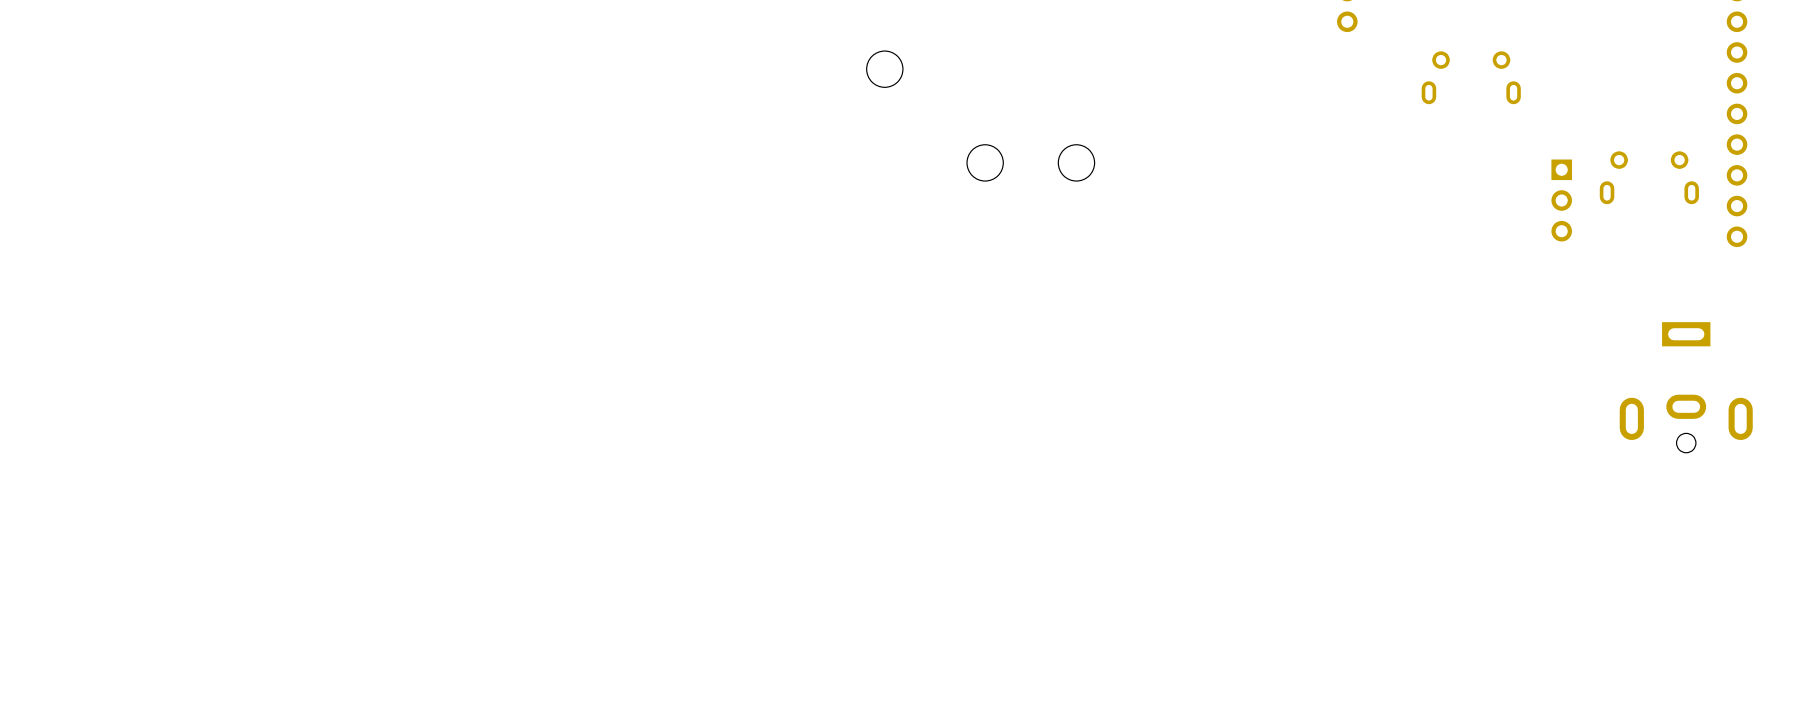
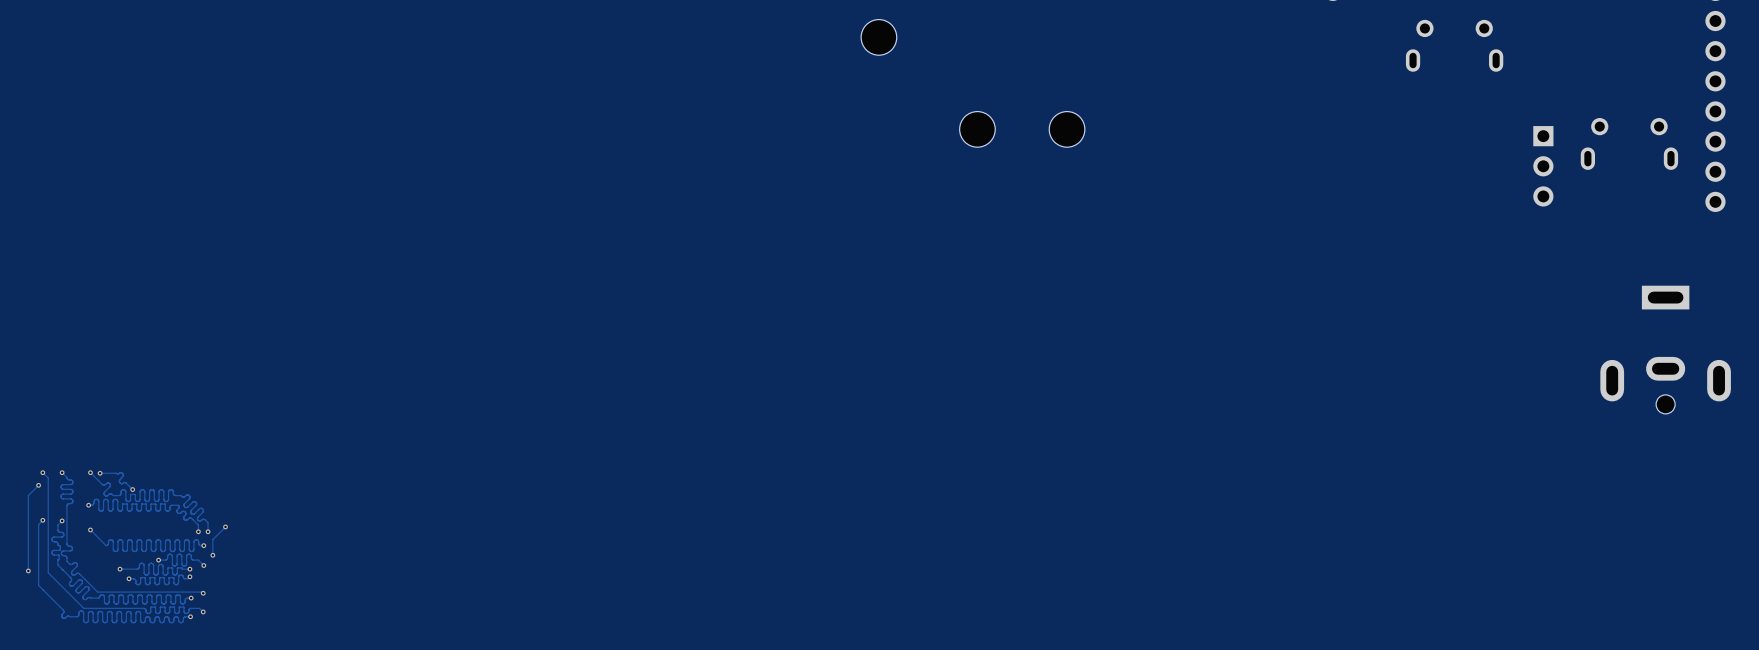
track: none -> (42, 472) (48, 478) (48, 572) (83, 608) (143, 608) (148, 613) (150, 607)
via: none -> (42, 472)
track: none -> (62, 472) (72, 482) (61, 486) (62, 489) (72, 491) (71, 493) (62, 494) (61, 496) (62, 498) (72, 500) (66, 505) (67, 544) (72, 549) (62, 551) (61, 553) (66, 556) (69, 564) (77, 563) (71, 572) (72, 574) (79, 573) (97, 592) (203, 593)
via: none -> (62, 472)
track: none -> (90, 472) (102, 484) (110, 484) (104, 492) (105, 495) (110, 493) (119, 495) (123, 489) (126, 500) (128, 501) (130, 500) (130, 494)
via: none -> (90, 472)
track: none -> (100, 473) (121, 472) (123, 475) (119, 482) (125, 482) (132, 489)
via: none -> (100, 473)
track: none -> (38, 485) (28, 495) (28, 570)
via: none -> (38, 485)
via: none -> (132, 489)
track: none -> (134, 494) (131, 494)
track: none -> (135, 494) (135, 500) (137, 501) (139, 500) (141, 489) (144, 491) (146, 501) (149, 500) (151, 489) (154, 491) (156, 501) (158, 500) (160, 489) (163, 491) (165, 501) (168, 500) (170, 489) (175, 495) (183, 497) (188, 495) (189, 498) (184, 506) (187, 507) (193, 501) (196, 502) (196, 505) (190, 511) (192, 514) (199, 508) (202, 509) (203, 511) (197, 518) (199, 521) (204, 519) (208, 522) (208, 532)
track: none -> (126, 504) (123, 504)
track: none -> (136, 504) (132, 504)
track: none -> (145, 504) (142, 504)
track: none -> (155, 504) (151, 504)
track: none -> (164, 504) (161, 504)
via: none -> (88, 505)
track: none -> (122, 504) (122, 509) (120, 511) (118, 509) (115, 499) (113, 500) (111, 511) (108, 509) (106, 499) (103, 500) (101, 511) (99, 509) (97, 499) (94, 500) (93, 504) (88, 505)
track: none -> (132, 504) (131, 509) (129, 511) (127, 509) (127, 504)
track: none -> (141, 504) (141, 509) (139, 511) (137, 509) (136, 504)
track: none -> (151, 504) (150, 509) (148, 511) (146, 509) (146, 504)
track: none -> (160, 504) (160, 509) (158, 511) (155, 509) (155, 504)
track: none -> (165, 504) (165, 509) (167, 511) (171, 505) (178, 505) (177, 512) (185, 511) (184, 519) (191, 518) (198, 525) (198, 531)
track: none -> (42, 520) (38, 524) (38, 585) (63, 610) (62, 617) (77, 616) (81, 610) (86, 622) (90, 611) (95, 622) (100, 611) (105, 622) (109, 611) (114, 622) (119, 611) (124, 622) (128, 611) (133, 622) (138, 611) (143, 622) (147, 616) (152, 622) (156, 616) (161, 622) (165, 617) (168, 617) (171, 622) (176, 616) (180, 622) (184, 617) (190, 616)
via: none -> (42, 520)
track: none -> (62, 520) (57, 525) (57, 529) (63, 533) (63, 535) (52, 538) (57, 544)
via: none -> (62, 520)
track: none -> (225, 526) (212, 539) (212, 555)
via: none -> (225, 526)
track: none -> (90, 529) (106, 545) (109, 540) (112, 540) (115, 551) (117, 550) (118, 541) (120, 539) (125, 551) (129, 539) (134, 551) (139, 539) (144, 551) (148, 539) (153, 551) (155, 550) (157, 539) (160, 541) (162, 551) (165, 550) (167, 539) (170, 541) (172, 551) (174, 550) (176, 539) (179, 541) (181, 551) (184, 550) (186, 539) (188, 541) (191, 551) (193, 550) (195, 539) (198, 540) (199, 545) (203, 545)
via: none -> (90, 529)
via: none -> (198, 531)
via: none -> (208, 531)
track: none -> (57, 544) (60, 549) (53, 550) (51, 552) (53, 554) (58, 555)
via: none -> (203, 545)
via: none -> (212, 555)
track: none -> (59, 555) (59, 559)
track: none -> (158, 560) (166, 559) (168, 555) (171, 554) (172, 564) (175, 565) (177, 555) (180, 554) (182, 564) (184, 565) (186, 555) (189, 554) (192, 559) (198, 560) (203, 565)
via: none -> (158, 560)
track: none -> (57, 560) (57, 564) (71, 578) (70, 585) (73, 585) (79, 579) (82, 580) (76, 589) (76, 592) (79, 592) (86, 586) (88, 587) (82, 596) (84, 599) (89, 597) (98, 598) (103, 595) (104, 602) (107, 603) (109, 595) (112, 595) (114, 602) (116, 603) (118, 595) (121, 595) (125, 604) (128, 602) (128, 595) (131, 595) (135, 604) (137, 602) (138, 595) (140, 595) (144, 604) (147, 602) (147, 595) (150, 595) (154, 604) (156, 602) (157, 595) (159, 595) (163, 604) (166, 602) (166, 595) (169, 595) (173, 604) (175, 602) (175, 595) (178, 595) (182, 604) (186, 598) (191, 598)
via: none -> (203, 565)
track: none -> (172, 567) (168, 567)
track: none -> (181, 567) (177, 567)
via: none -> (120, 569)
track: none -> (167, 568) (167, 573) (165, 575) (161, 564) (158, 565) (156, 575) (153, 573) (151, 563) (149, 564) (147, 575) (144, 573) (142, 563) (137, 569) (120, 569)
track: none -> (177, 568) (177, 573) (175, 575) (172, 573) (172, 568)
track: none -> (189, 569) (182, 569)
via: none -> (189, 569)
via: none -> (28, 570)
track: none -> (189, 576) (184, 578) (179, 575) (178, 583) (176, 584) (174, 583) (173, 578)
via: none -> (189, 576)
track: none -> (144, 577) (141, 577)
track: none -> (154, 577) (150, 577)
track: none -> (163, 577) (160, 577)
track: none -> (173, 577) (169, 577)
via: none -> (129, 578)
track: none -> (140, 578) (140, 583) (138, 584) (134, 579) (129, 578)
track: none -> (150, 578) (149, 583) (147, 584) (145, 583) (145, 578)
track: none -> (159, 578) (159, 583) (157, 584) (155, 583) (154, 578)
track: none -> (169, 578) (168, 583) (166, 584) (164, 583) (164, 578)
via: none -> (203, 593)
via: none -> (191, 598)
track: none -> (154, 607) (151, 607)
track: none -> (164, 607) (160, 607)
track: none -> (173, 607) (170, 607)
track: none -> (183, 607) (179, 607)
track: none -> (160, 607) (157, 613) (155, 607)
track: none -> (169, 607) (167, 613) (165, 607)
track: none -> (179, 607) (176, 613) (174, 607)
track: none -> (184, 607) (185, 613) (191, 608) (199, 608) (203, 611)
via: none -> (203, 611)
via: none -> (190, 616)

